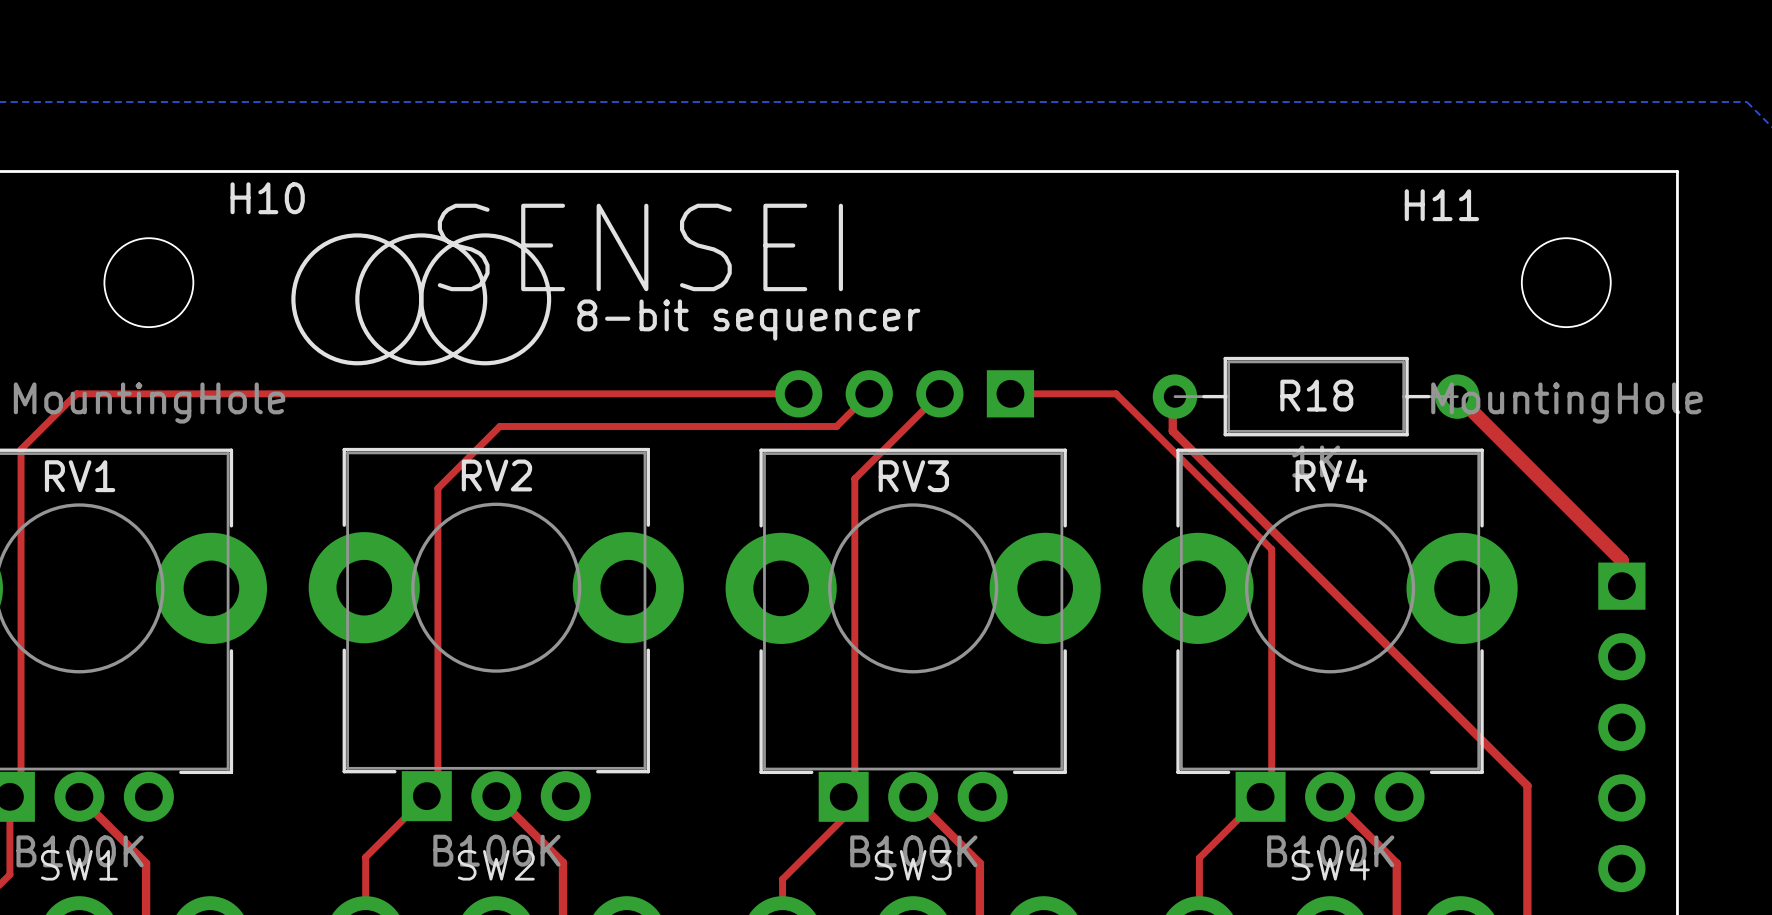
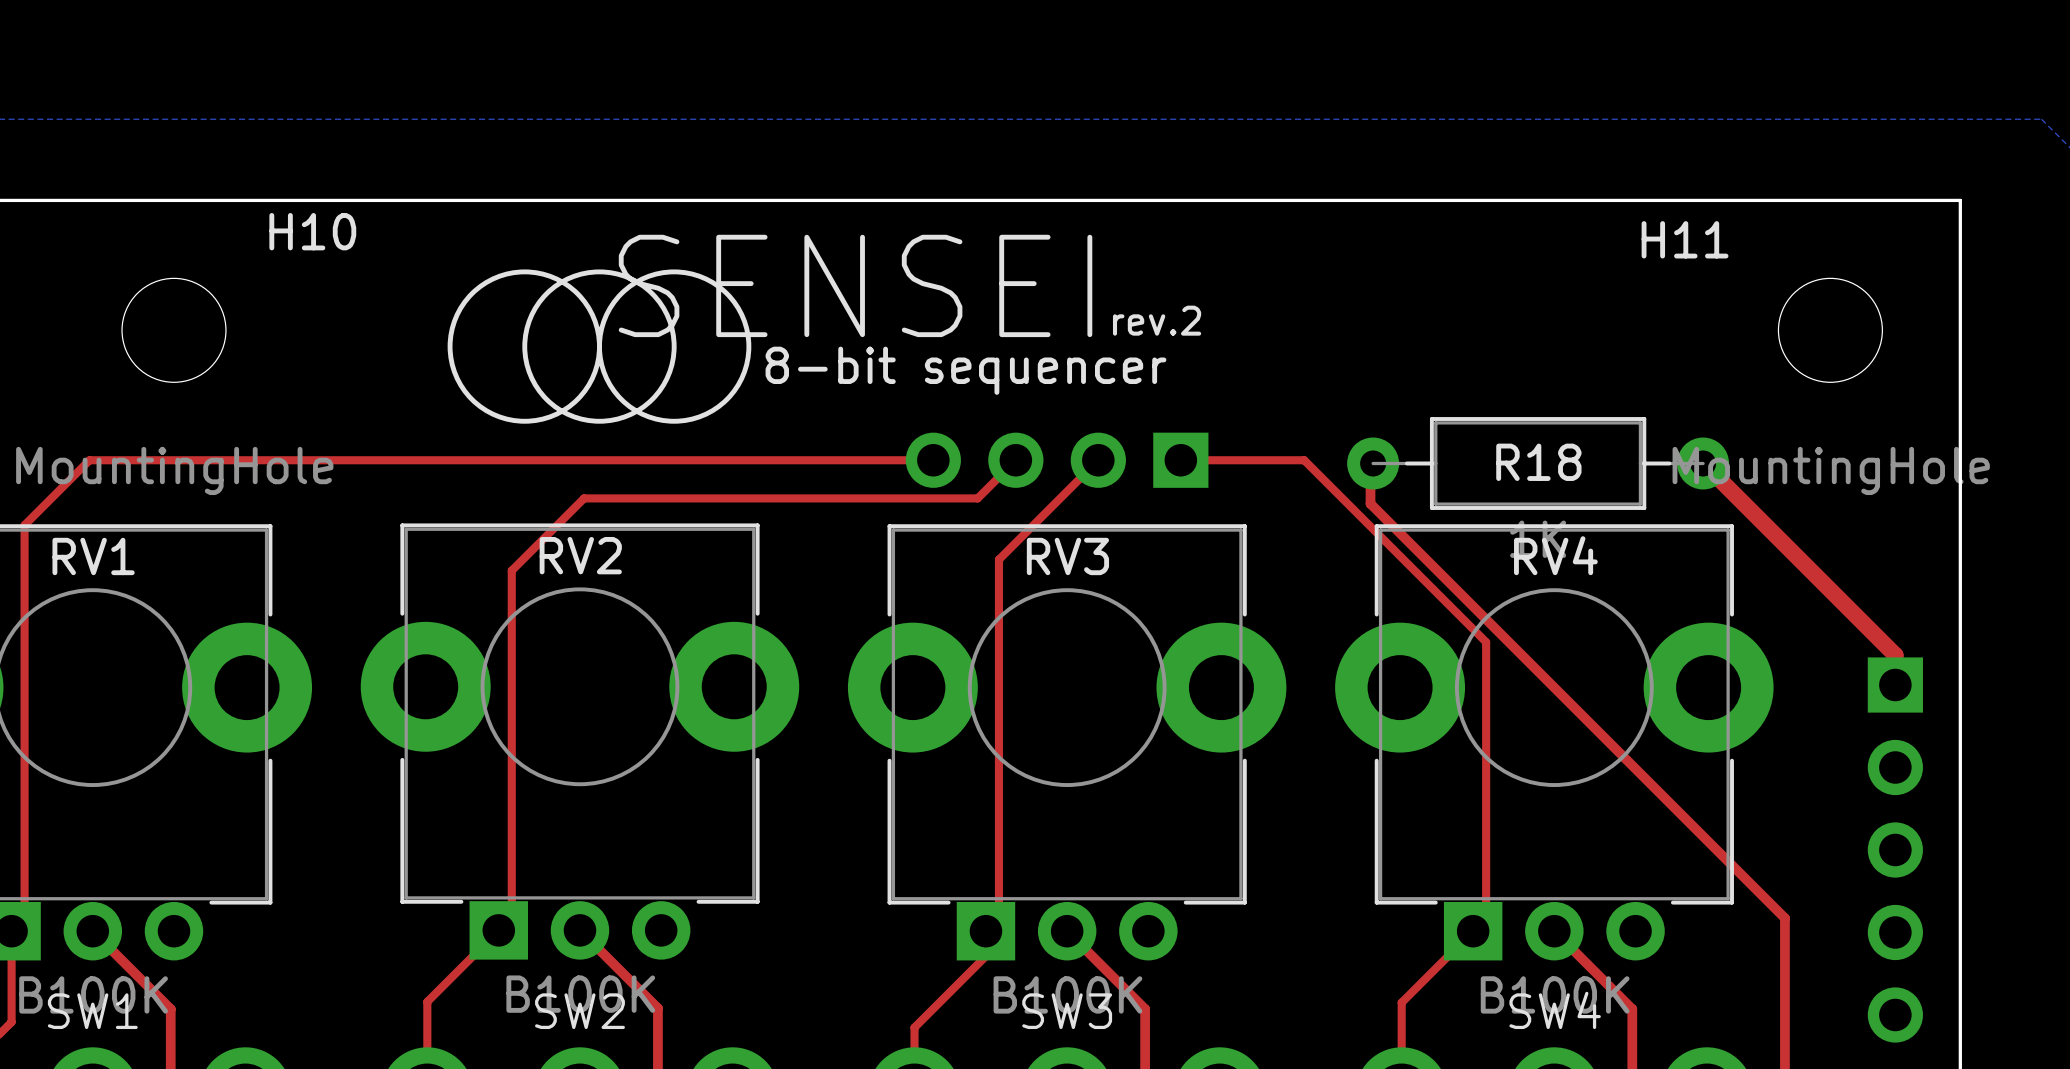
drawing: none -> [447, 269, 752, 424]
drawing: [291, 233, 552, 366] -> none
text position: SENSEI (640, 247) -> SENSEI (855, 285)
text: none -> rev.2 (1157, 320)
text position: 8-bit sequencer (748, 320) -> 8-bit sequencer (965, 370)

